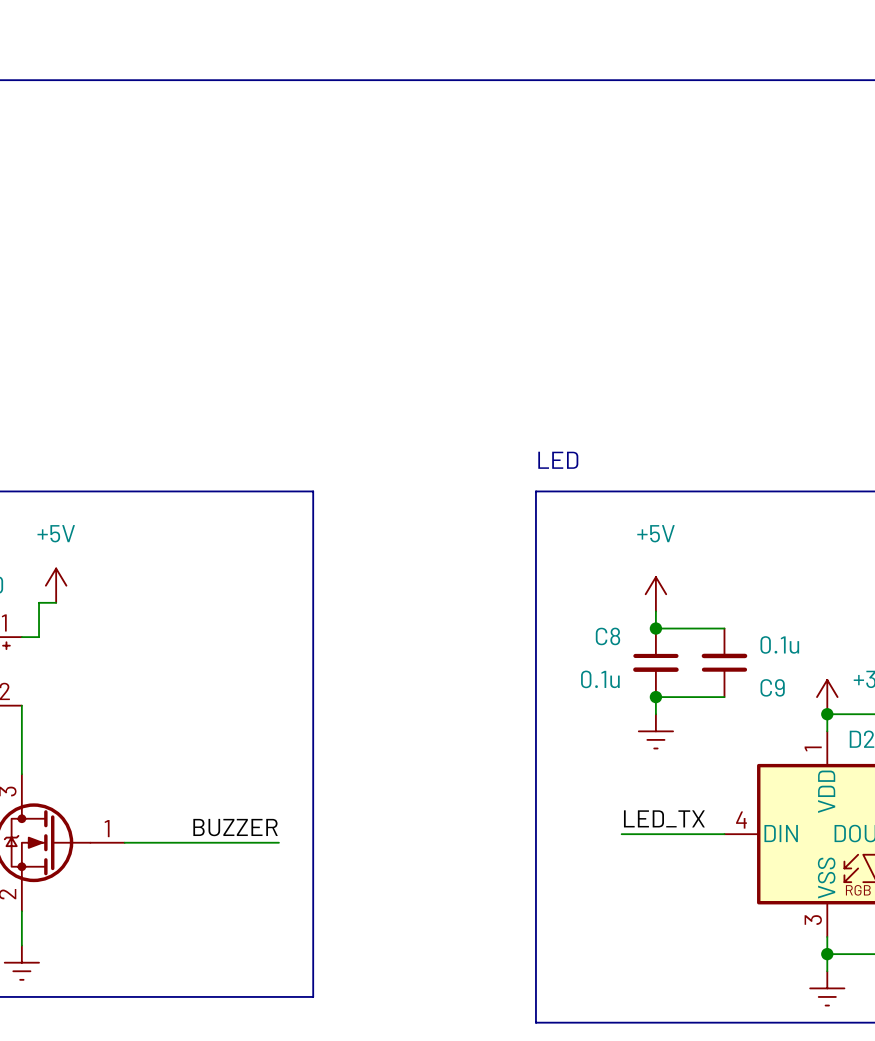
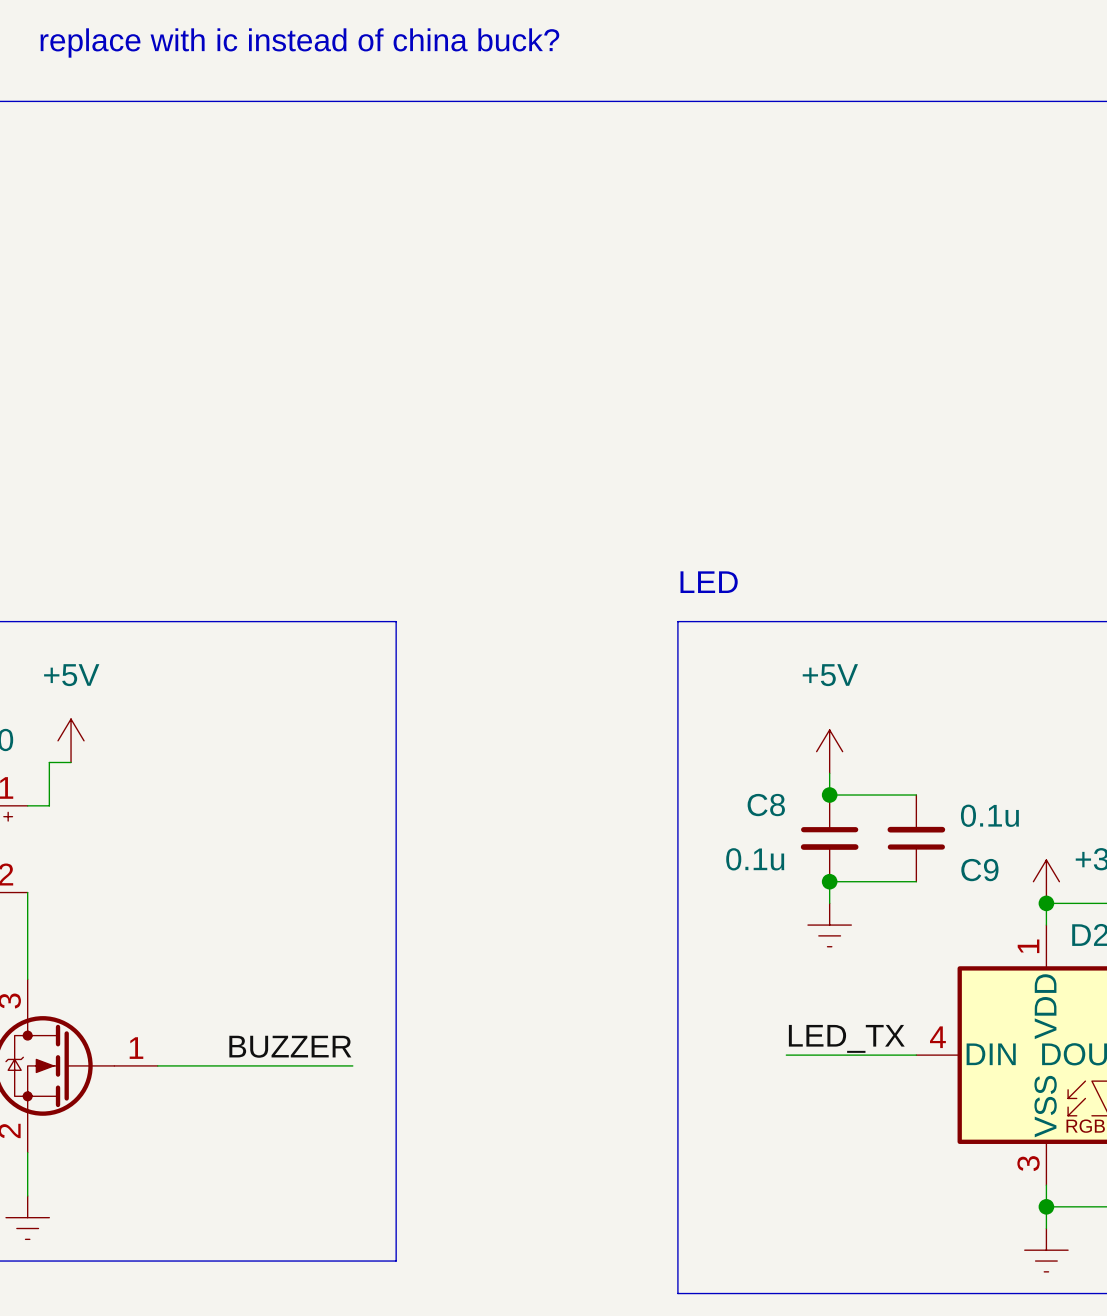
text: none -> replace with ic instead of china buck? (299, 42)

